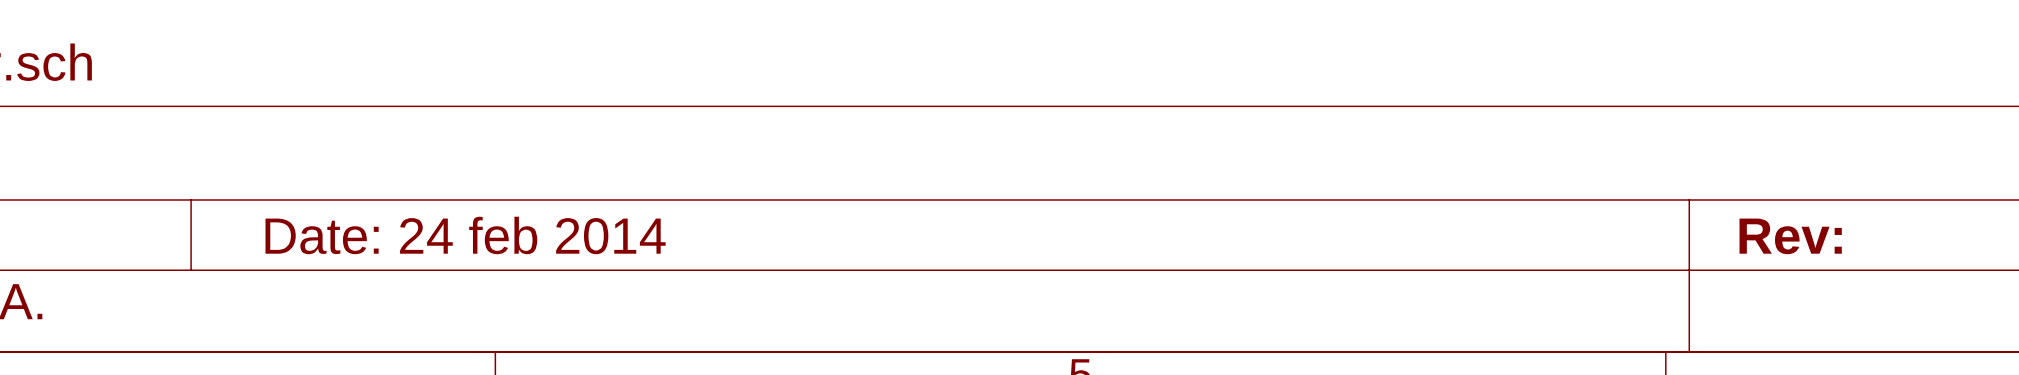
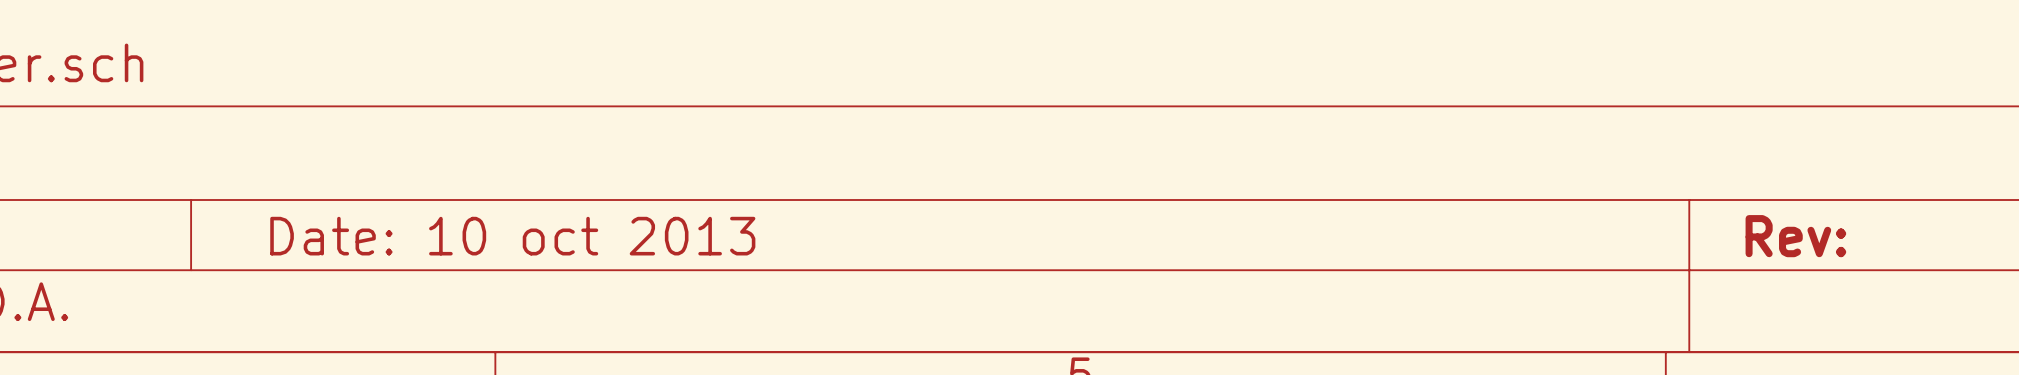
title block: Date: 24 feb 2014 (465, 235) -> Date: 10 oct 2013 (512, 236)

